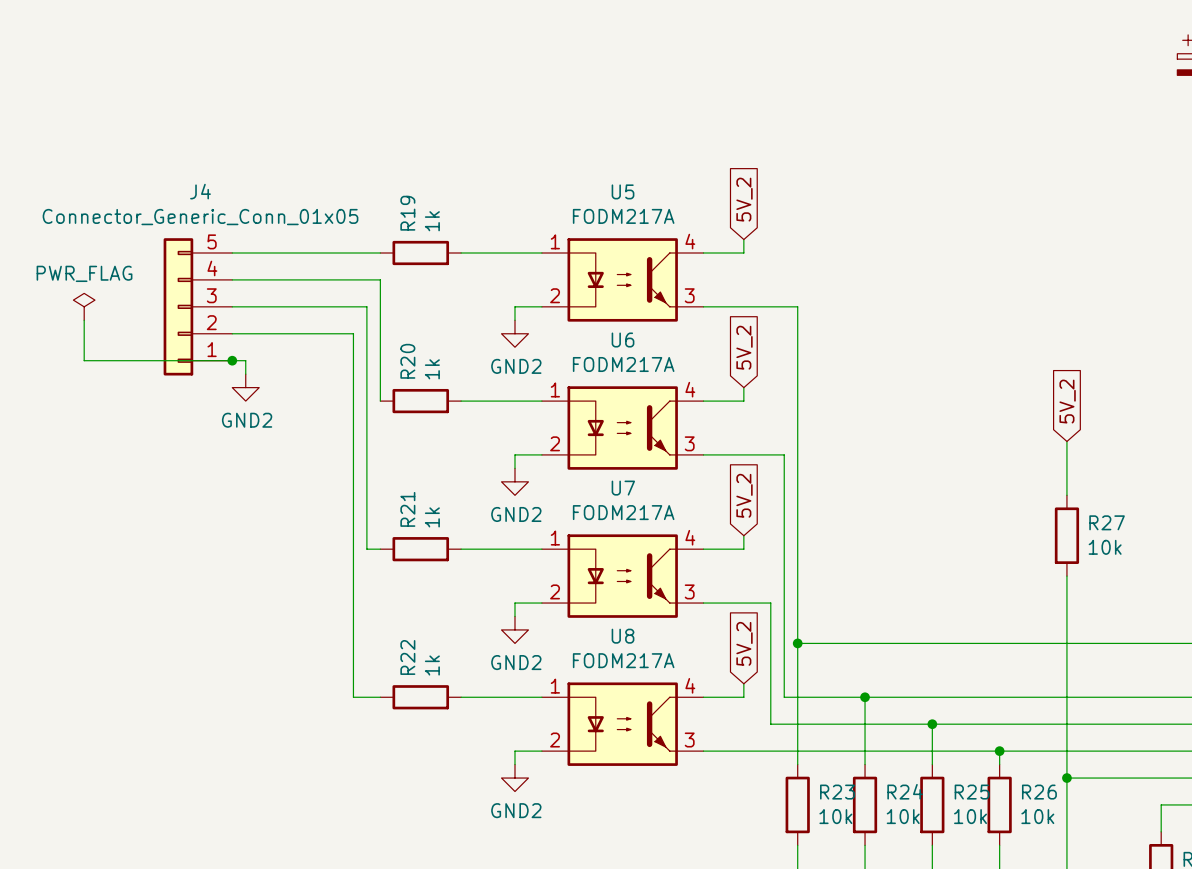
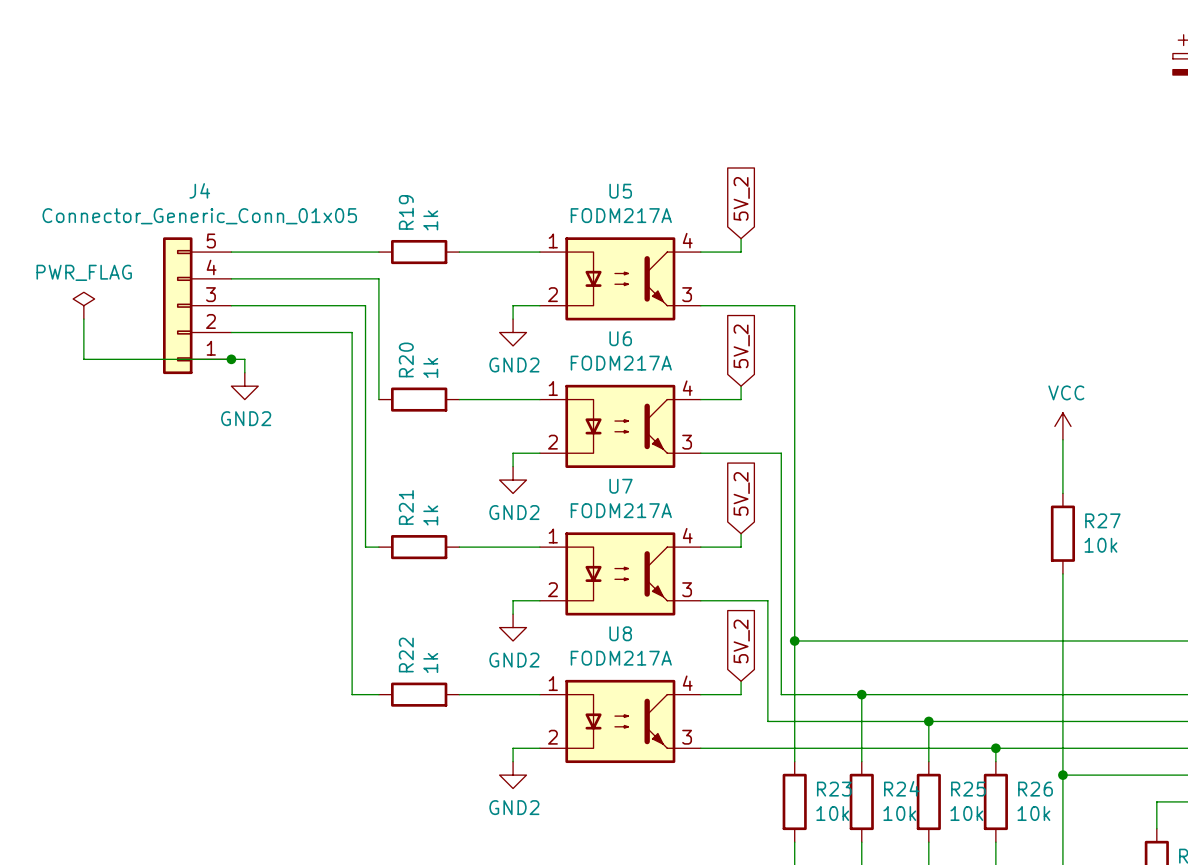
global label: 5V_2 (1067, 401) -> none
power symbol: none -> VCC (1062, 426)

